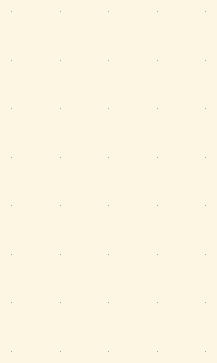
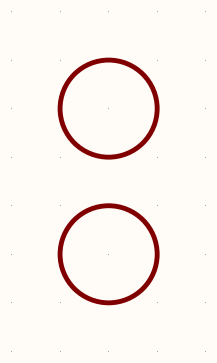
part: none -> (108, 108)
part: none -> (108, 254)

